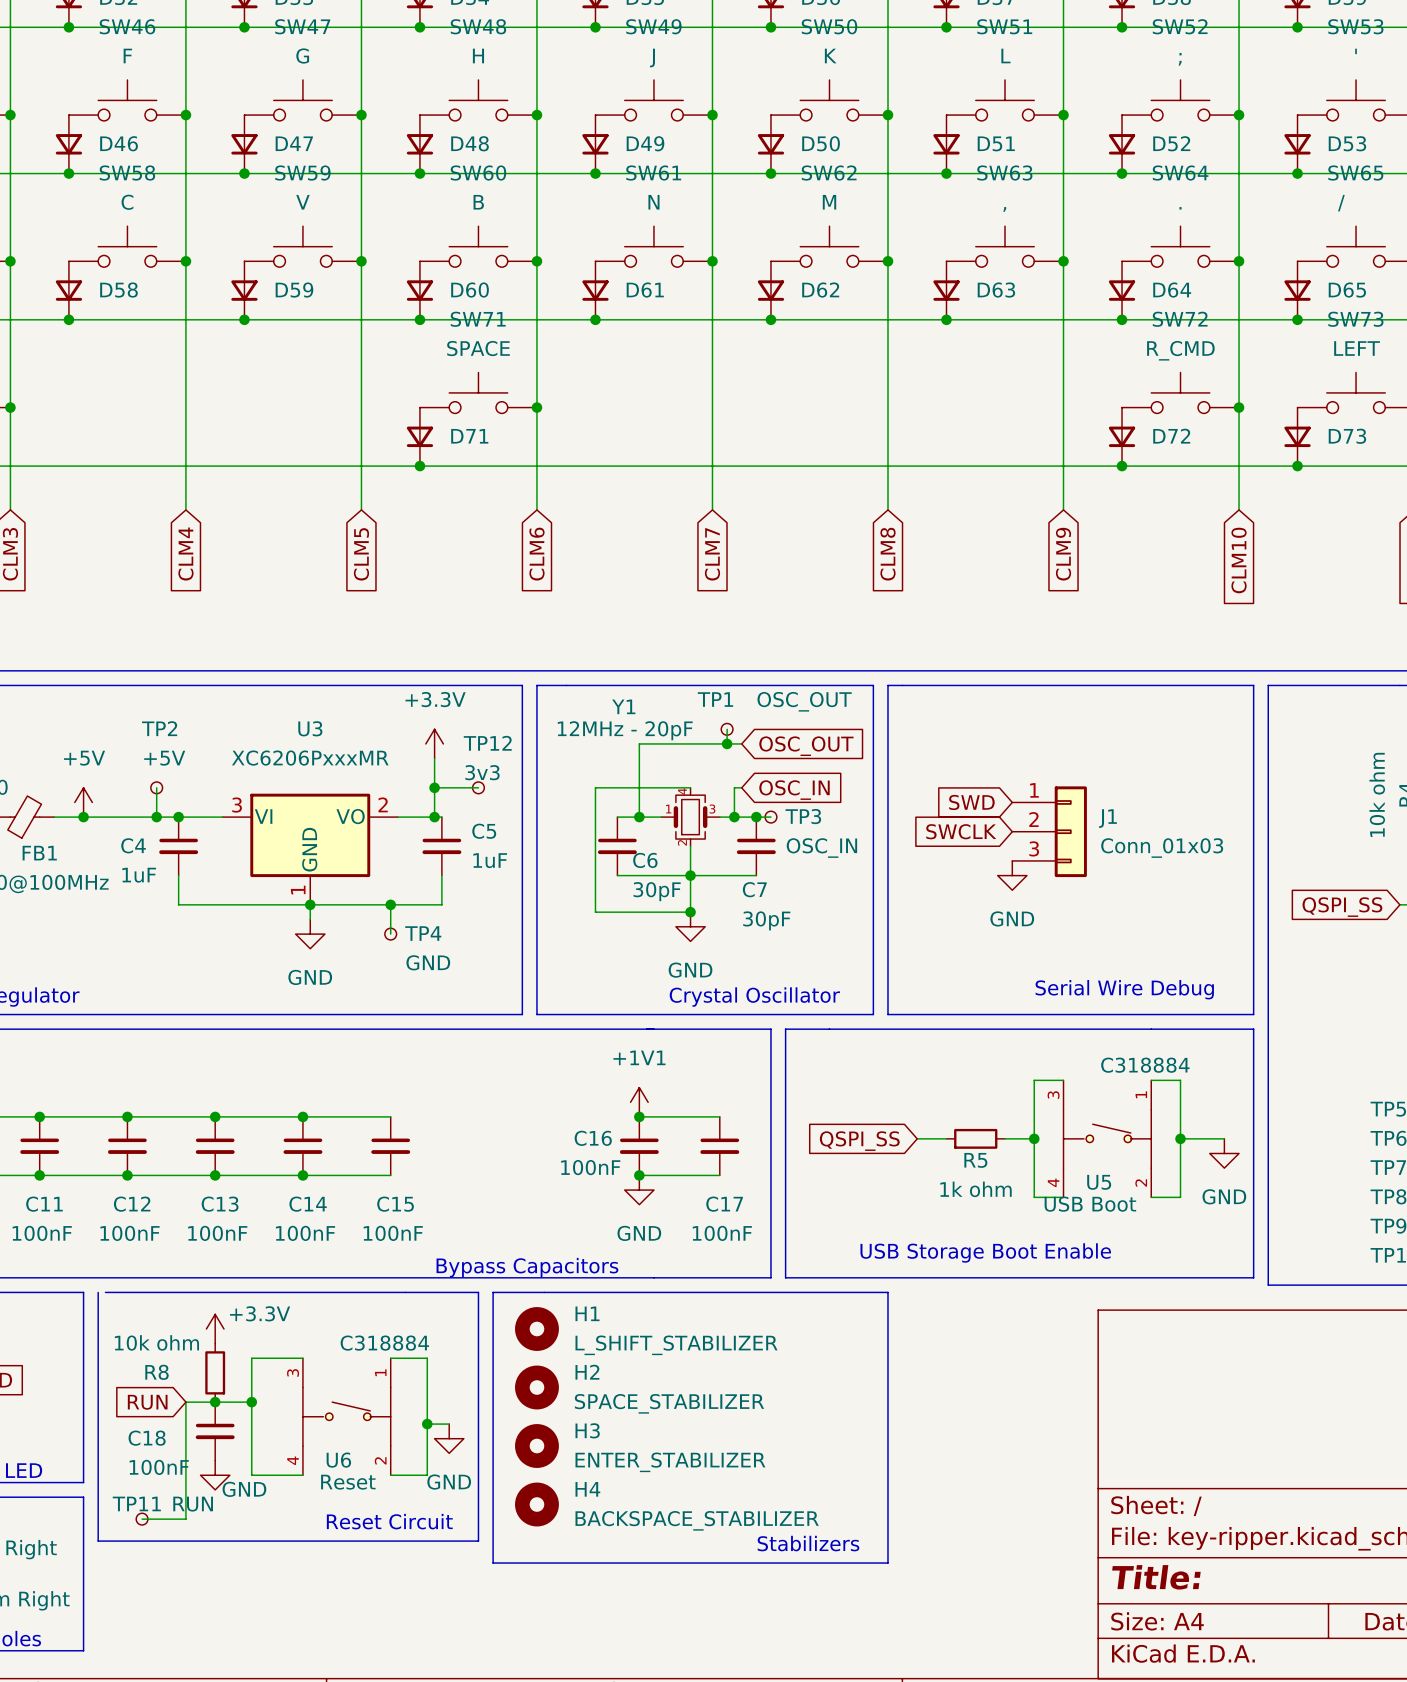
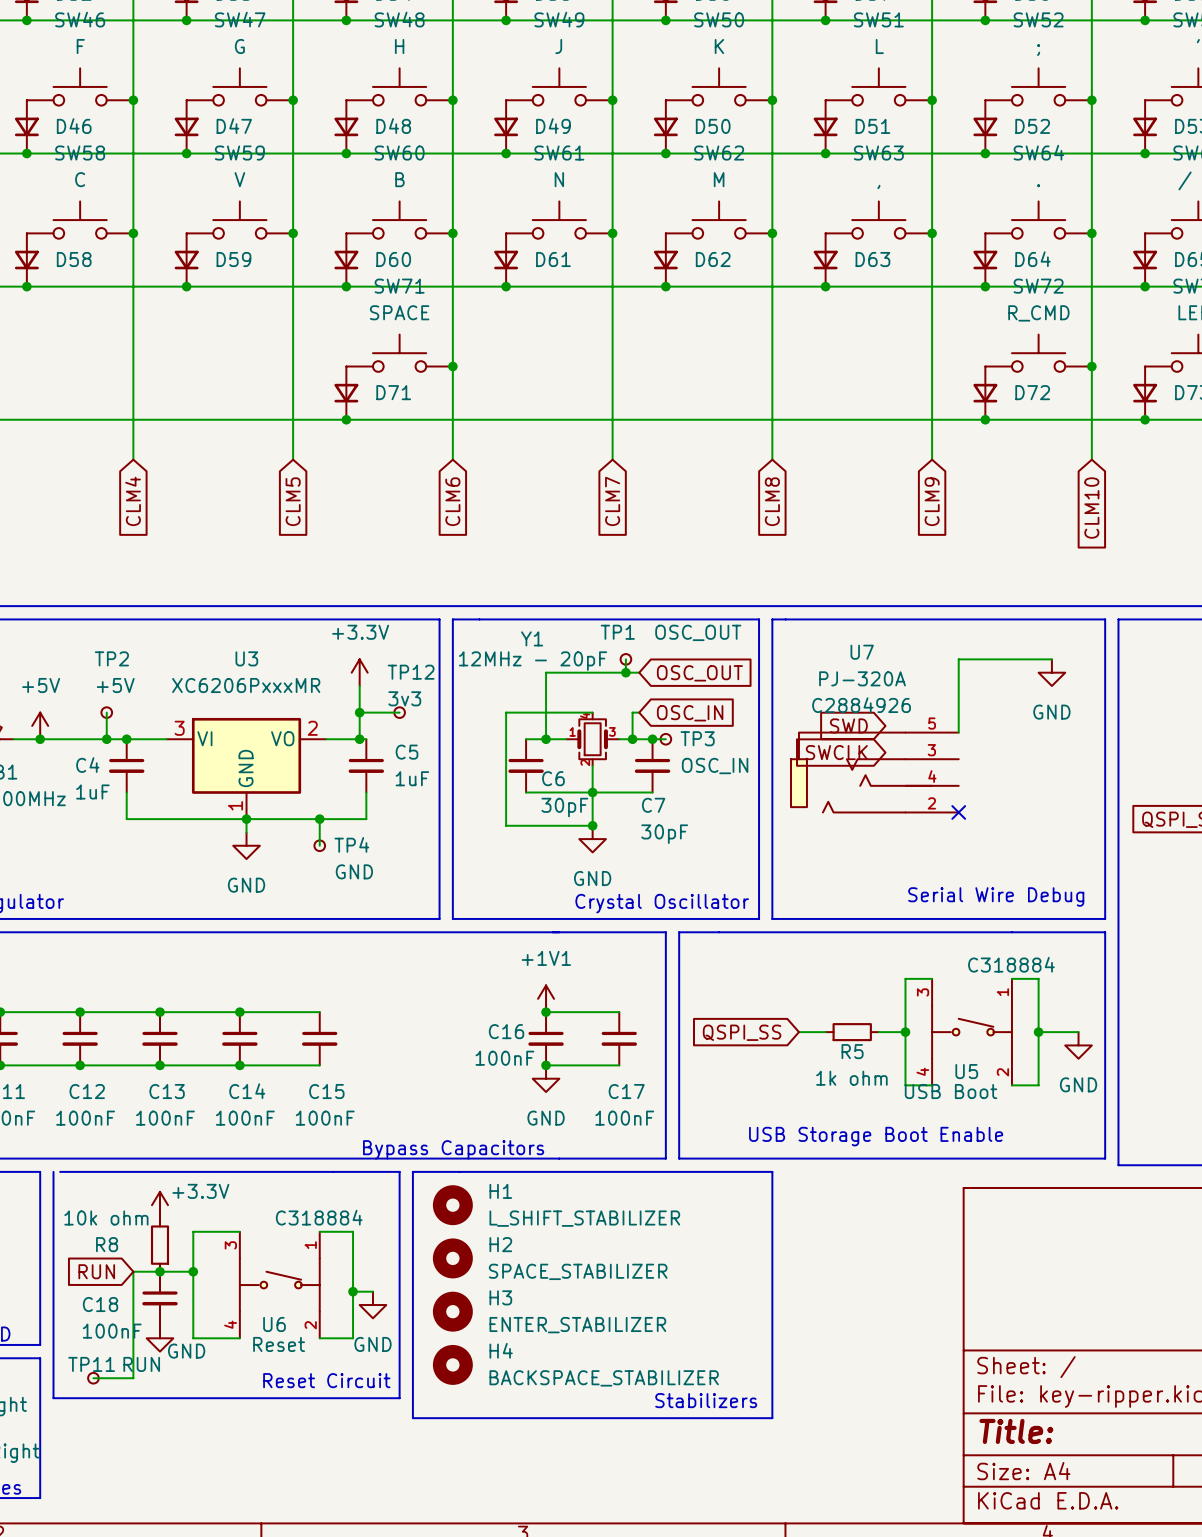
wire: none -> (1051, 659) (958, 659) (958, 732)
J1: Conn_01x03 (1049, 831) -> none
U7: none -> PJ-320A (874, 772)
power symbol position: GND (1012, 875) -> GND (1051, 672)
no-connect mark: none -> (958, 812)

